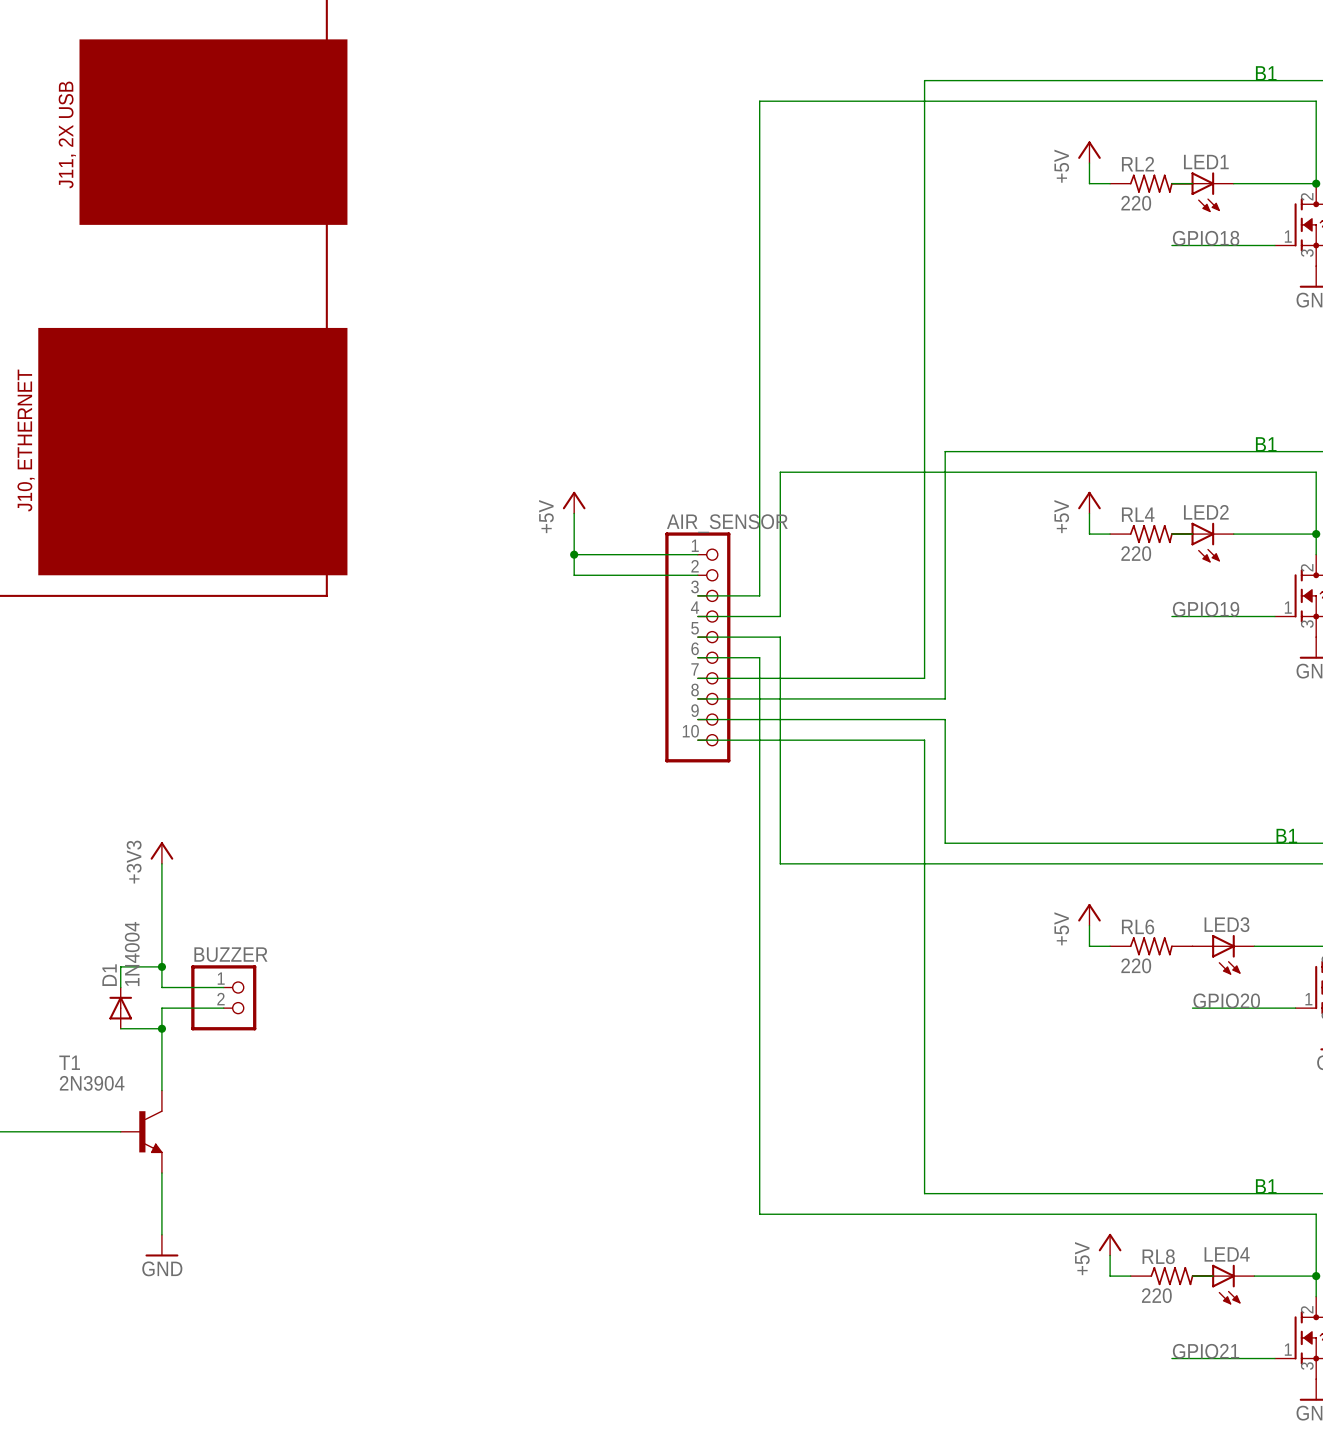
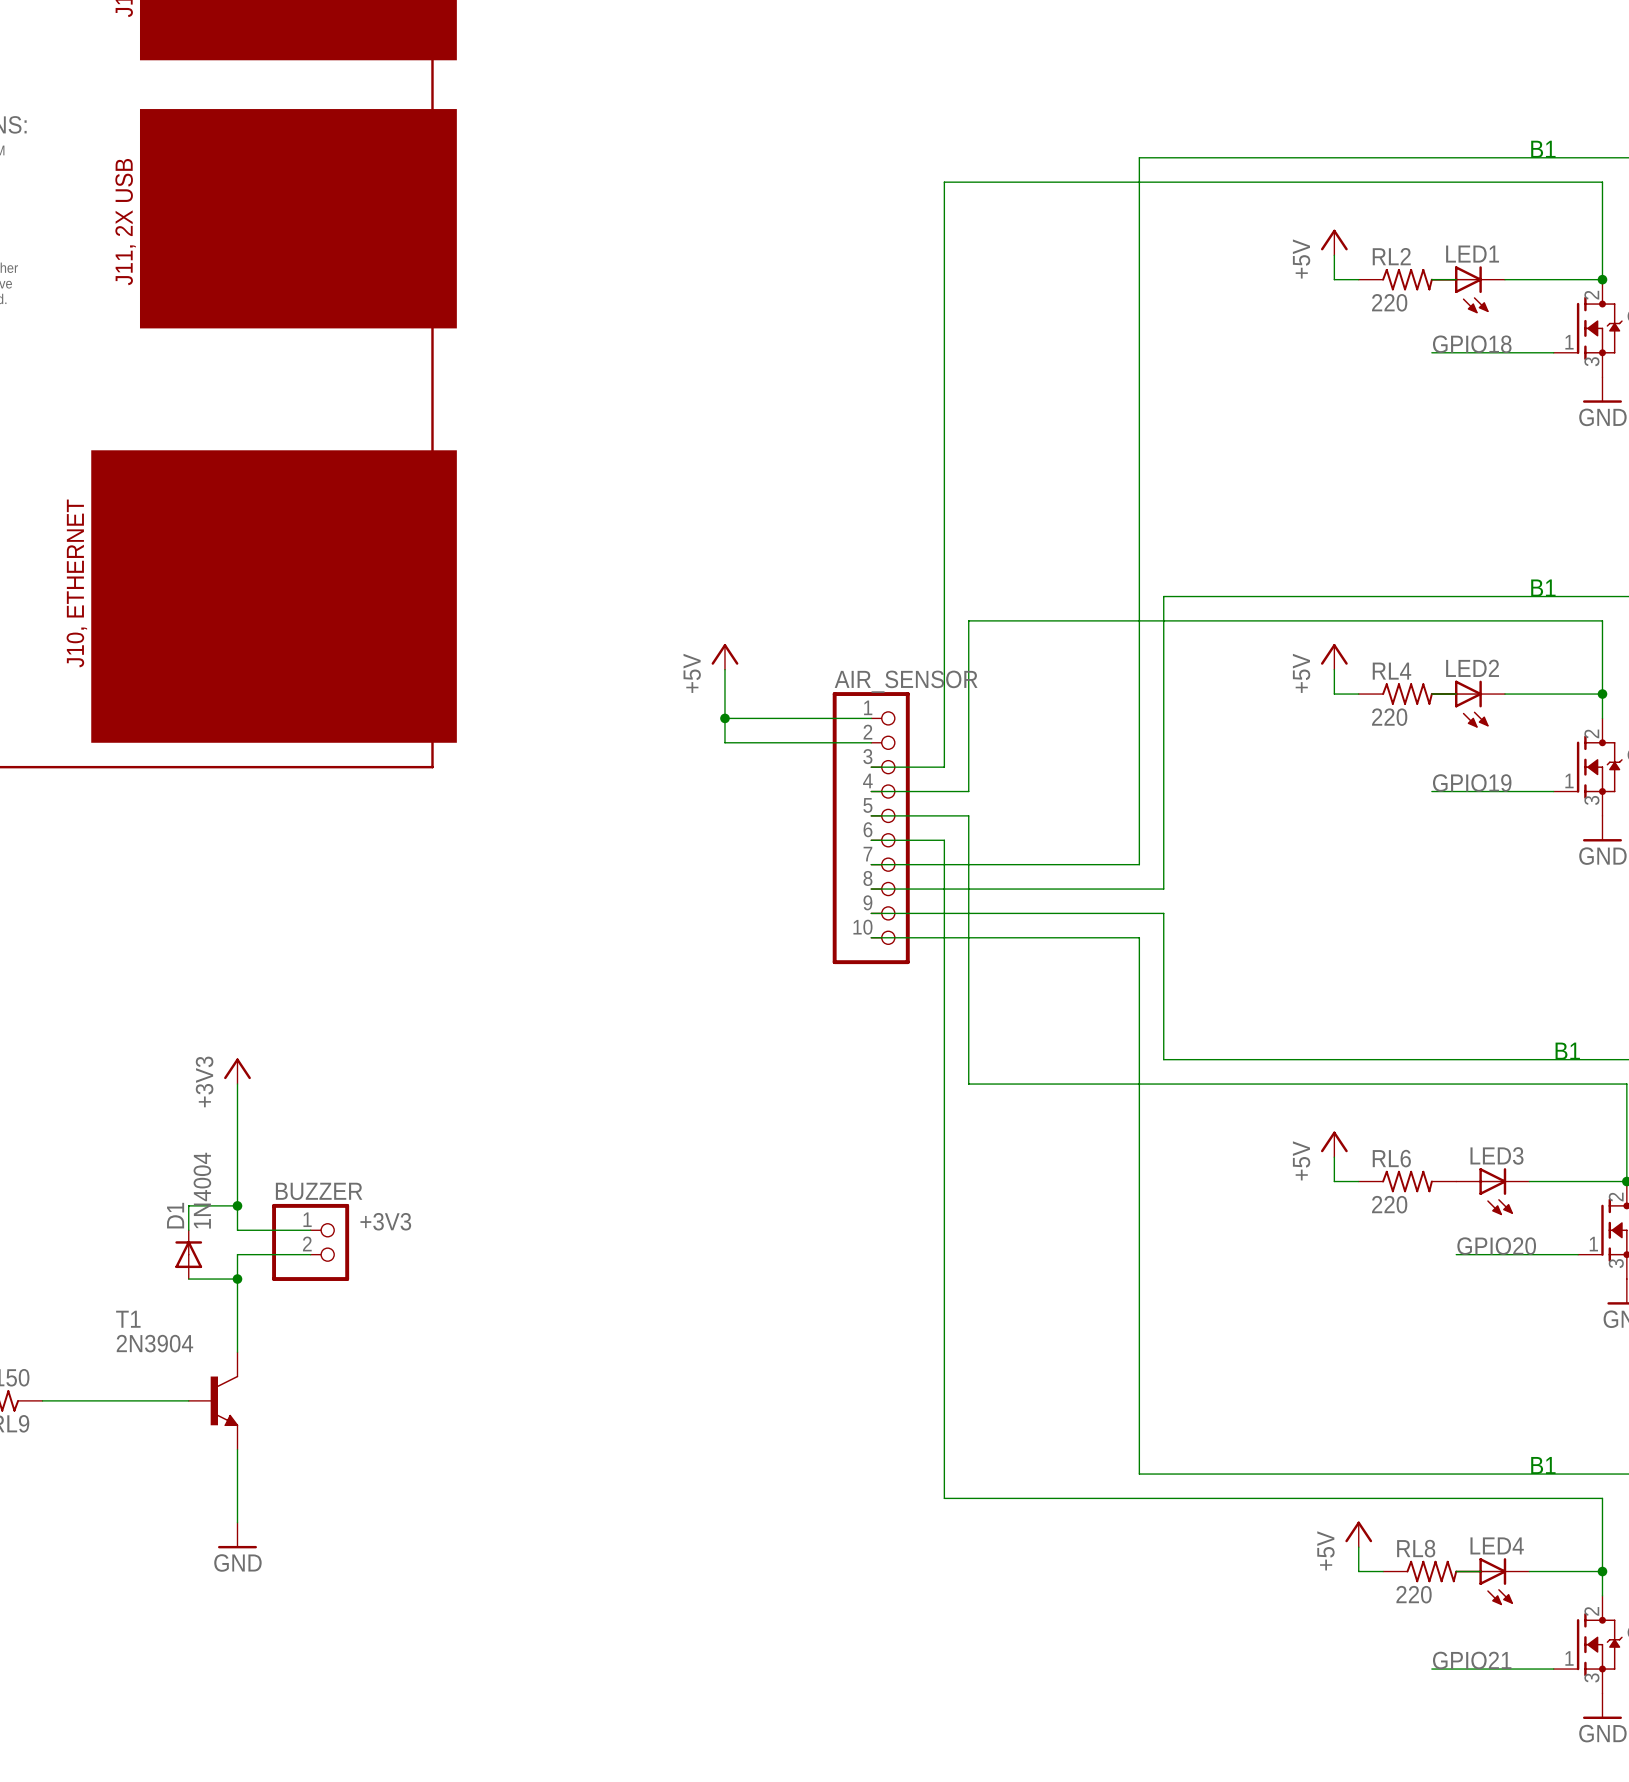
label: none -> +3V3 (385, 1221)

